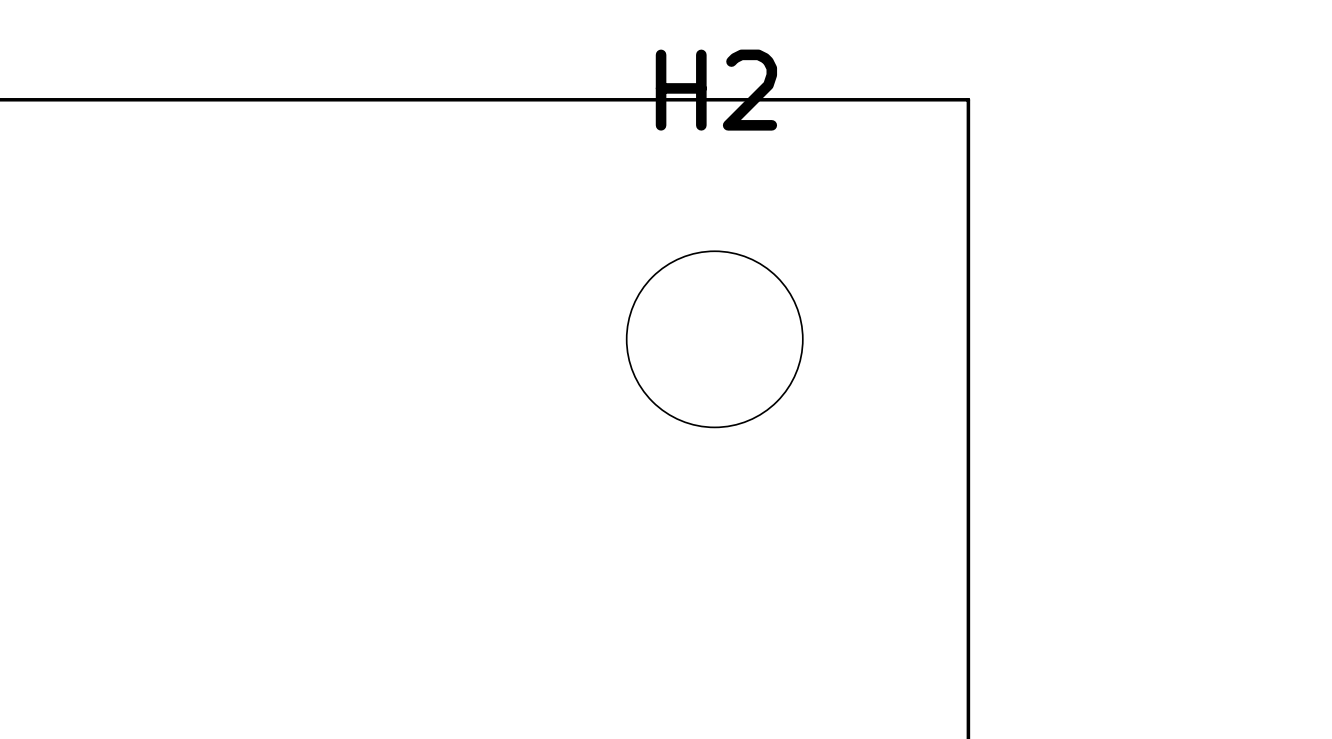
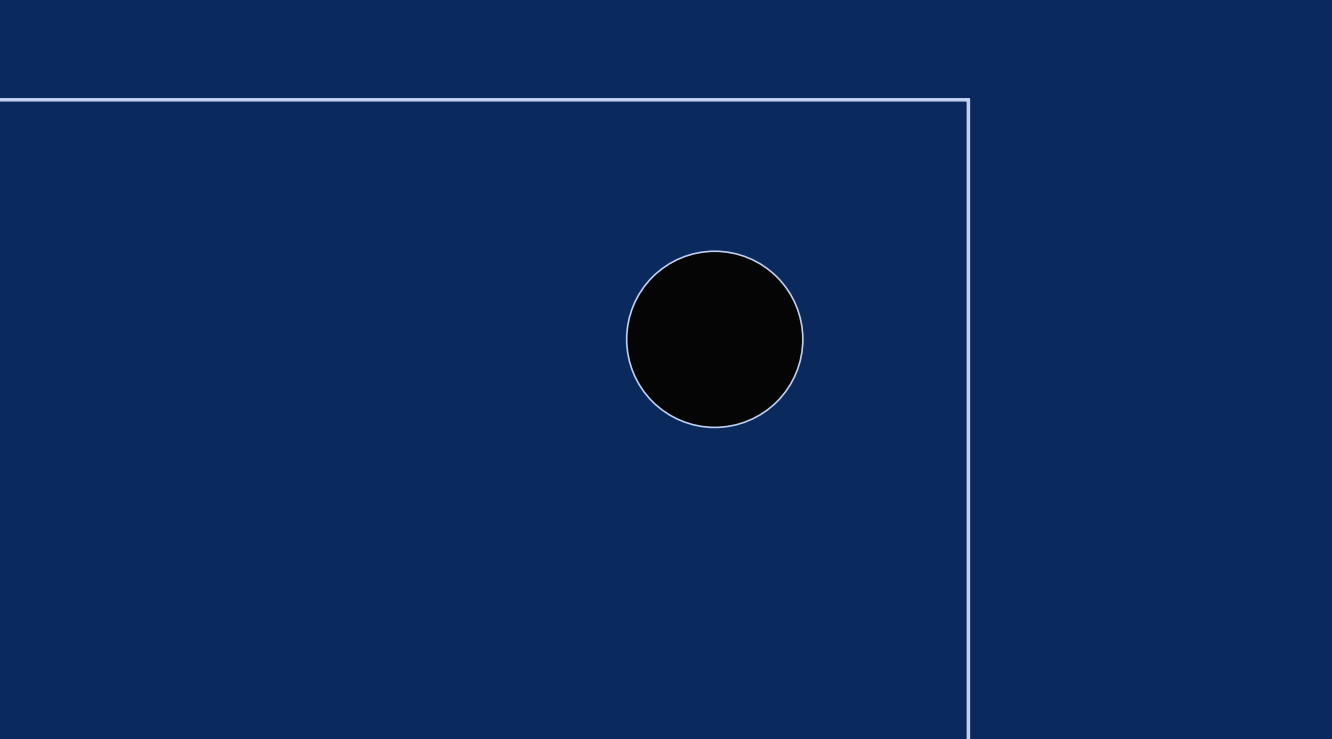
H2 name: H2 (716, 90) -> none

